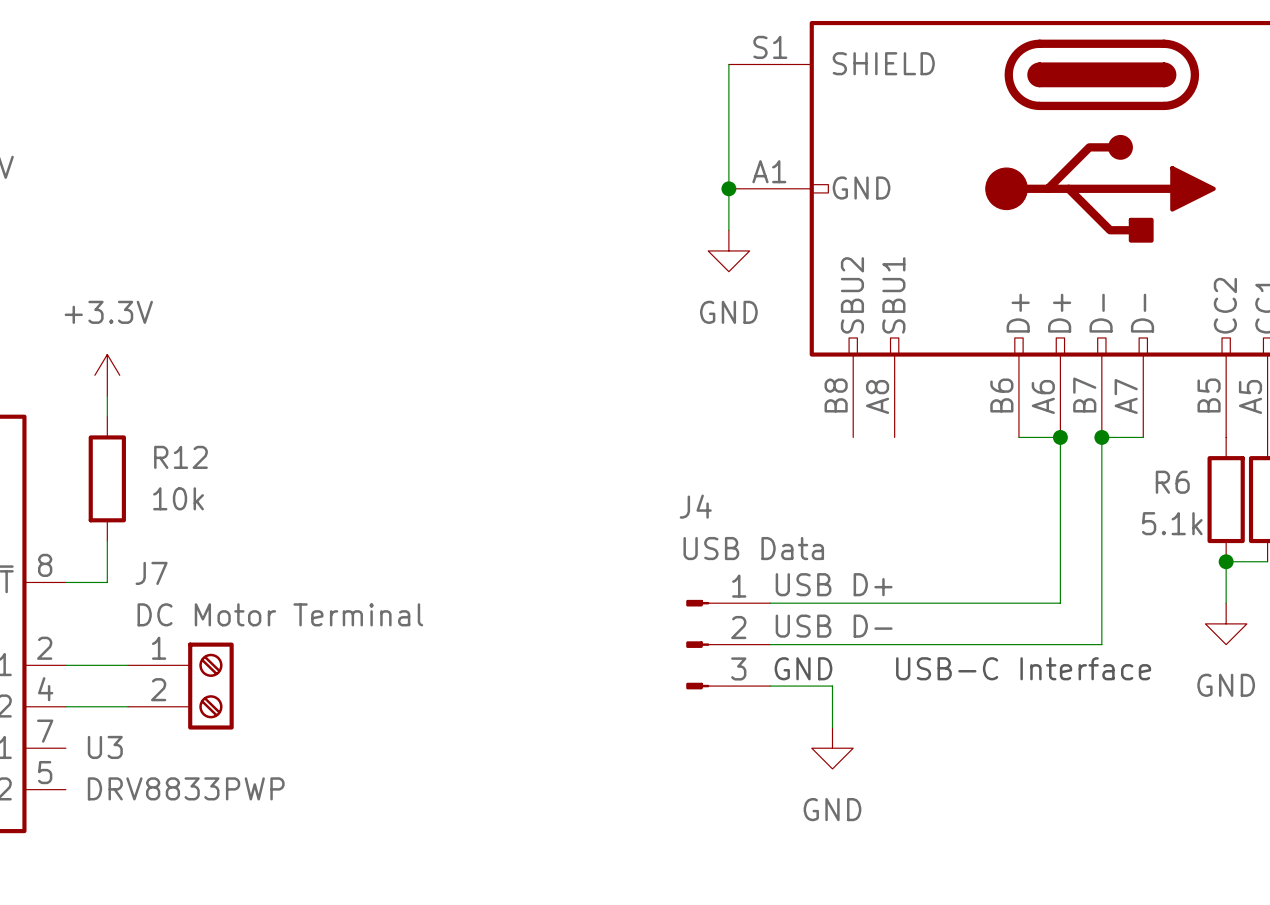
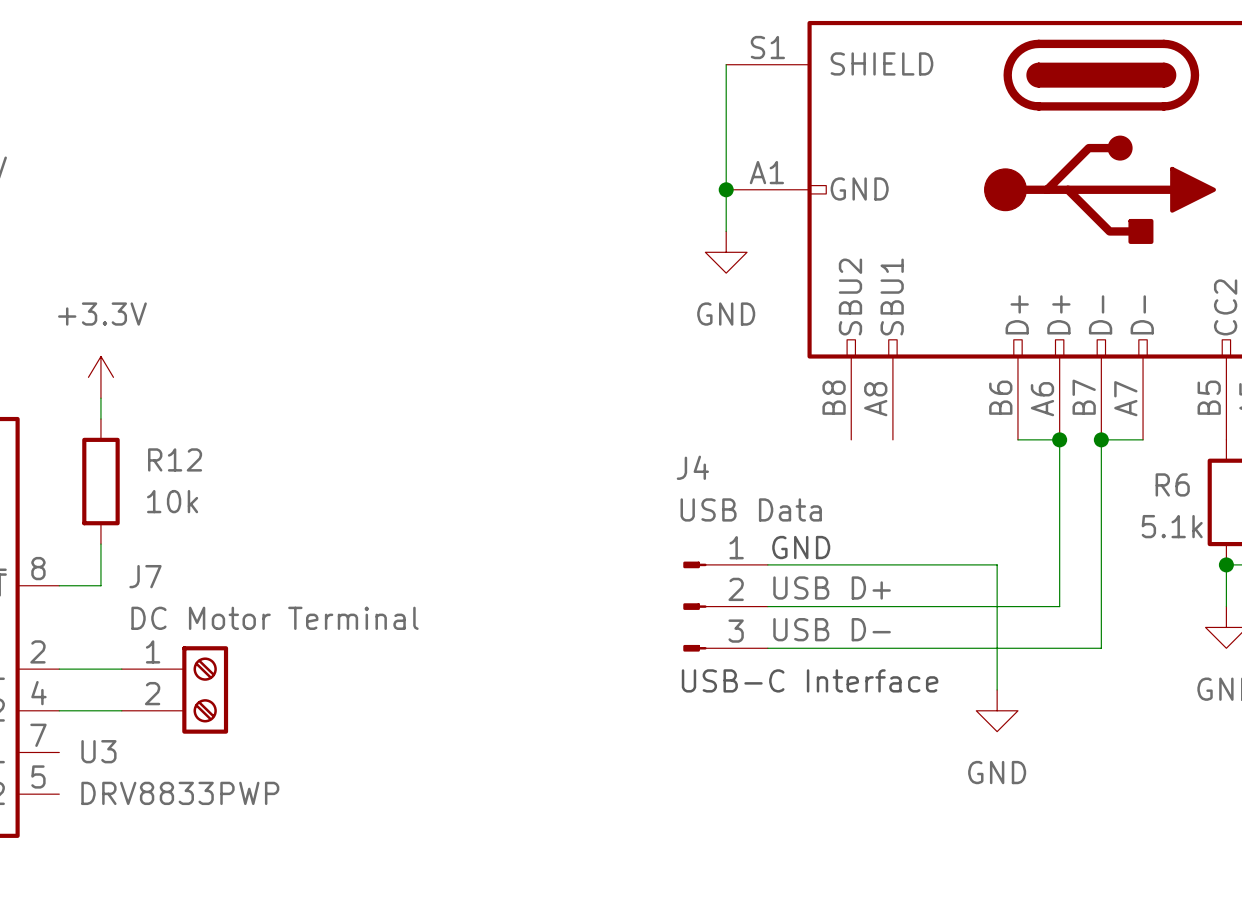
wire: none -> (767, 564) (997, 564) (997, 689)
J4 position: (728, 644) -> (725, 606)
text position: GND (803, 668) -> GND (801, 547)
text position: USB-C Interface (1023, 668) -> USB-C Interface (810, 680)
wire: (770, 686) (832, 686) (832, 727) -> none
power symbol position: GND (832, 748) -> GND (997, 710)

